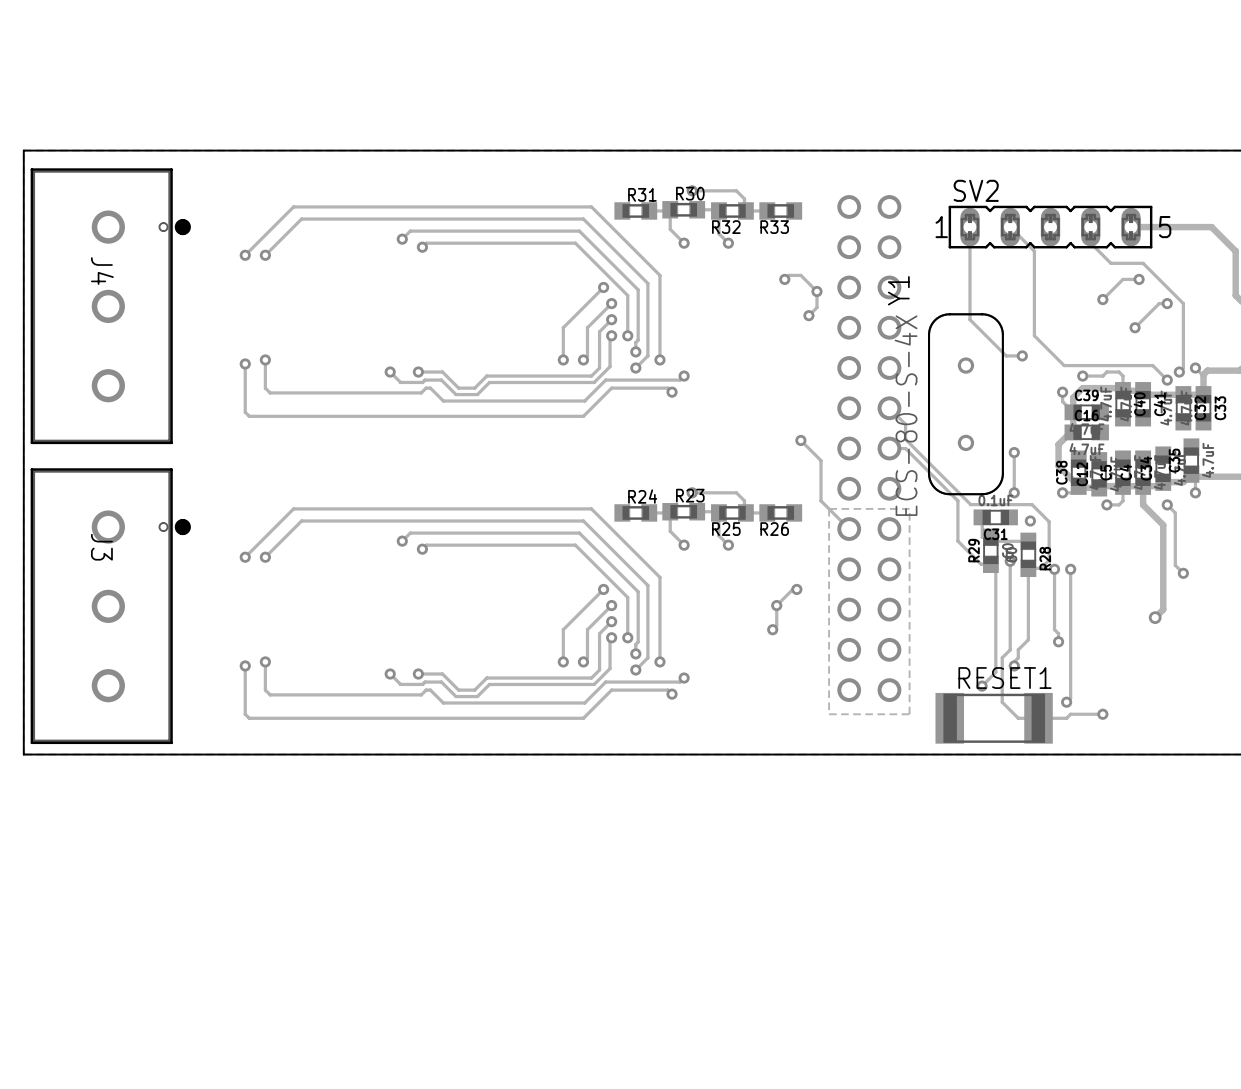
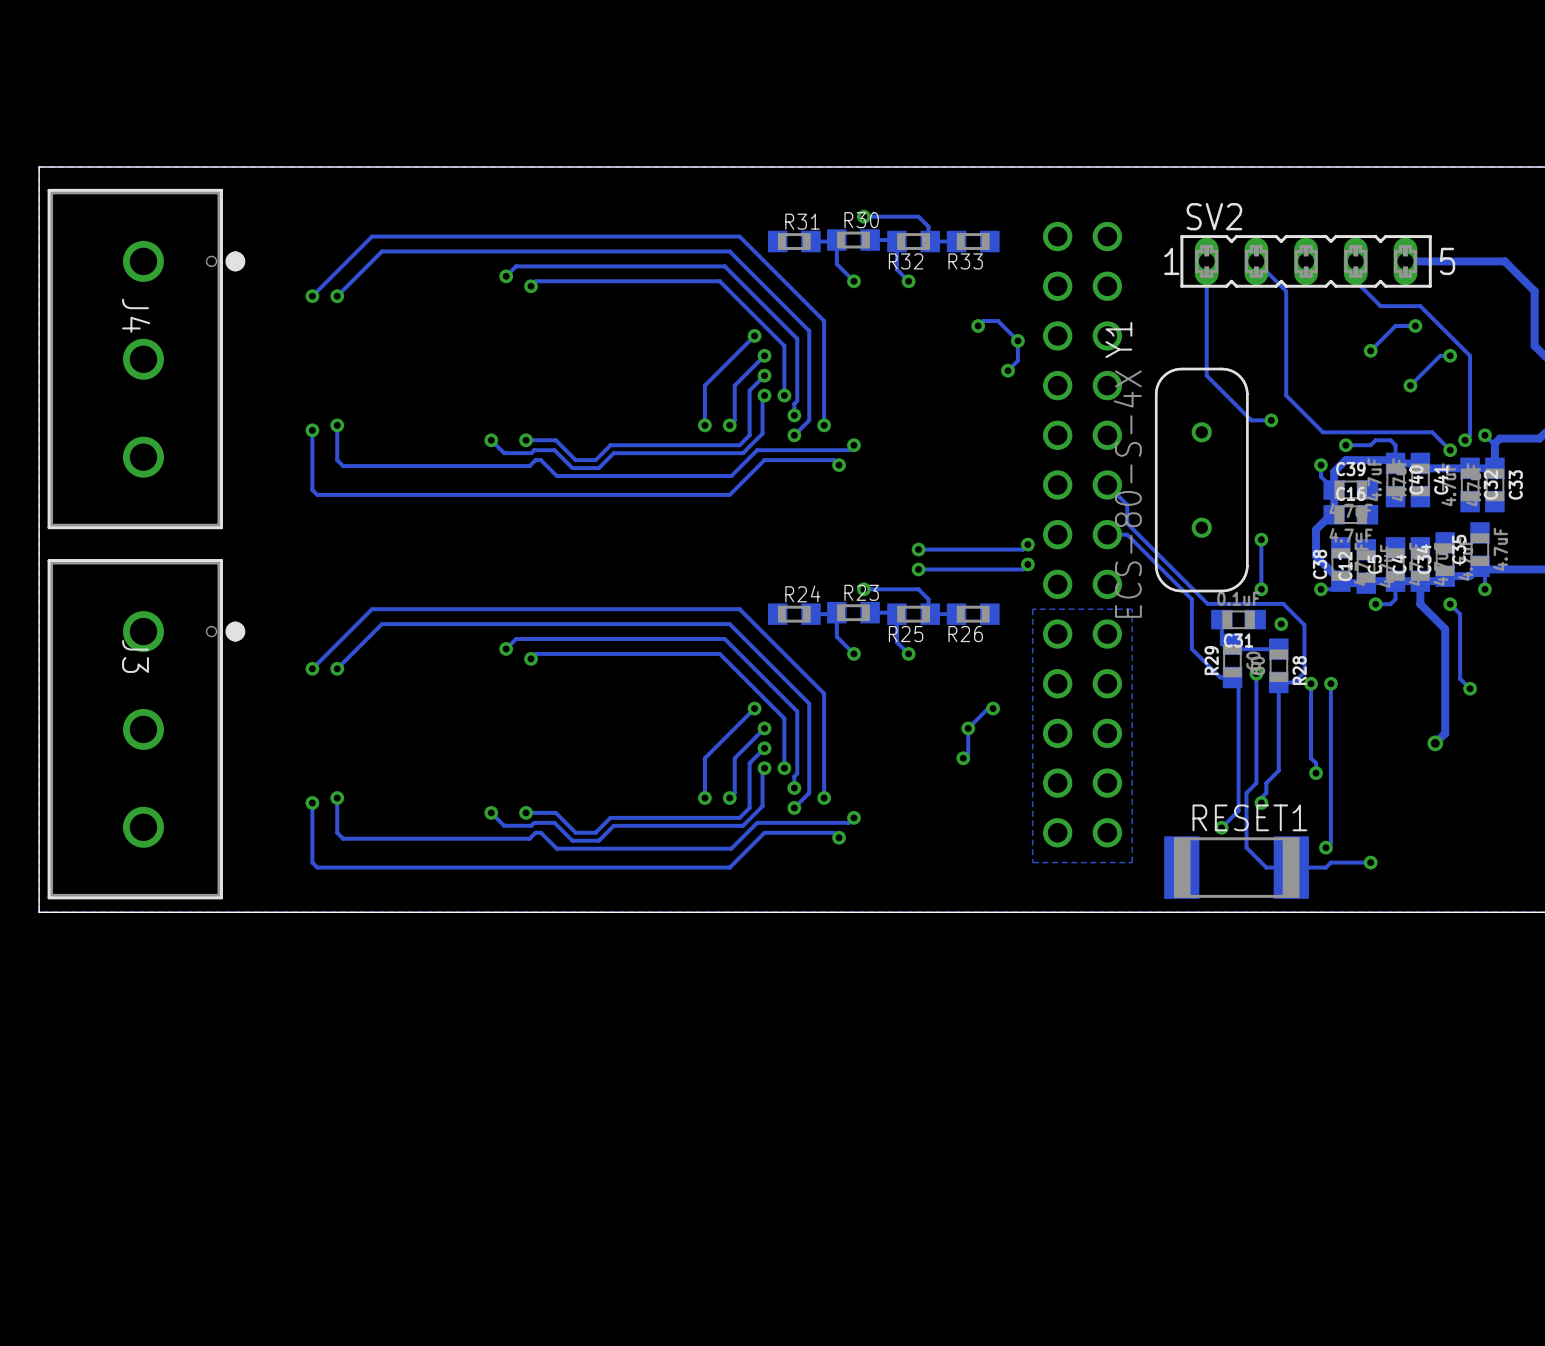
track: (800, 440) (821, 460) (821, 500) (849, 529) -> none
via: (800, 440) -> none
track: none -> (1027, 544) (1022, 549) (918, 549)
via: none -> (1027, 544)
via: none -> (918, 549)
track: none -> (1027, 564) (1022, 569) (918, 569)
via: none -> (1027, 564)
via: none -> (918, 569)

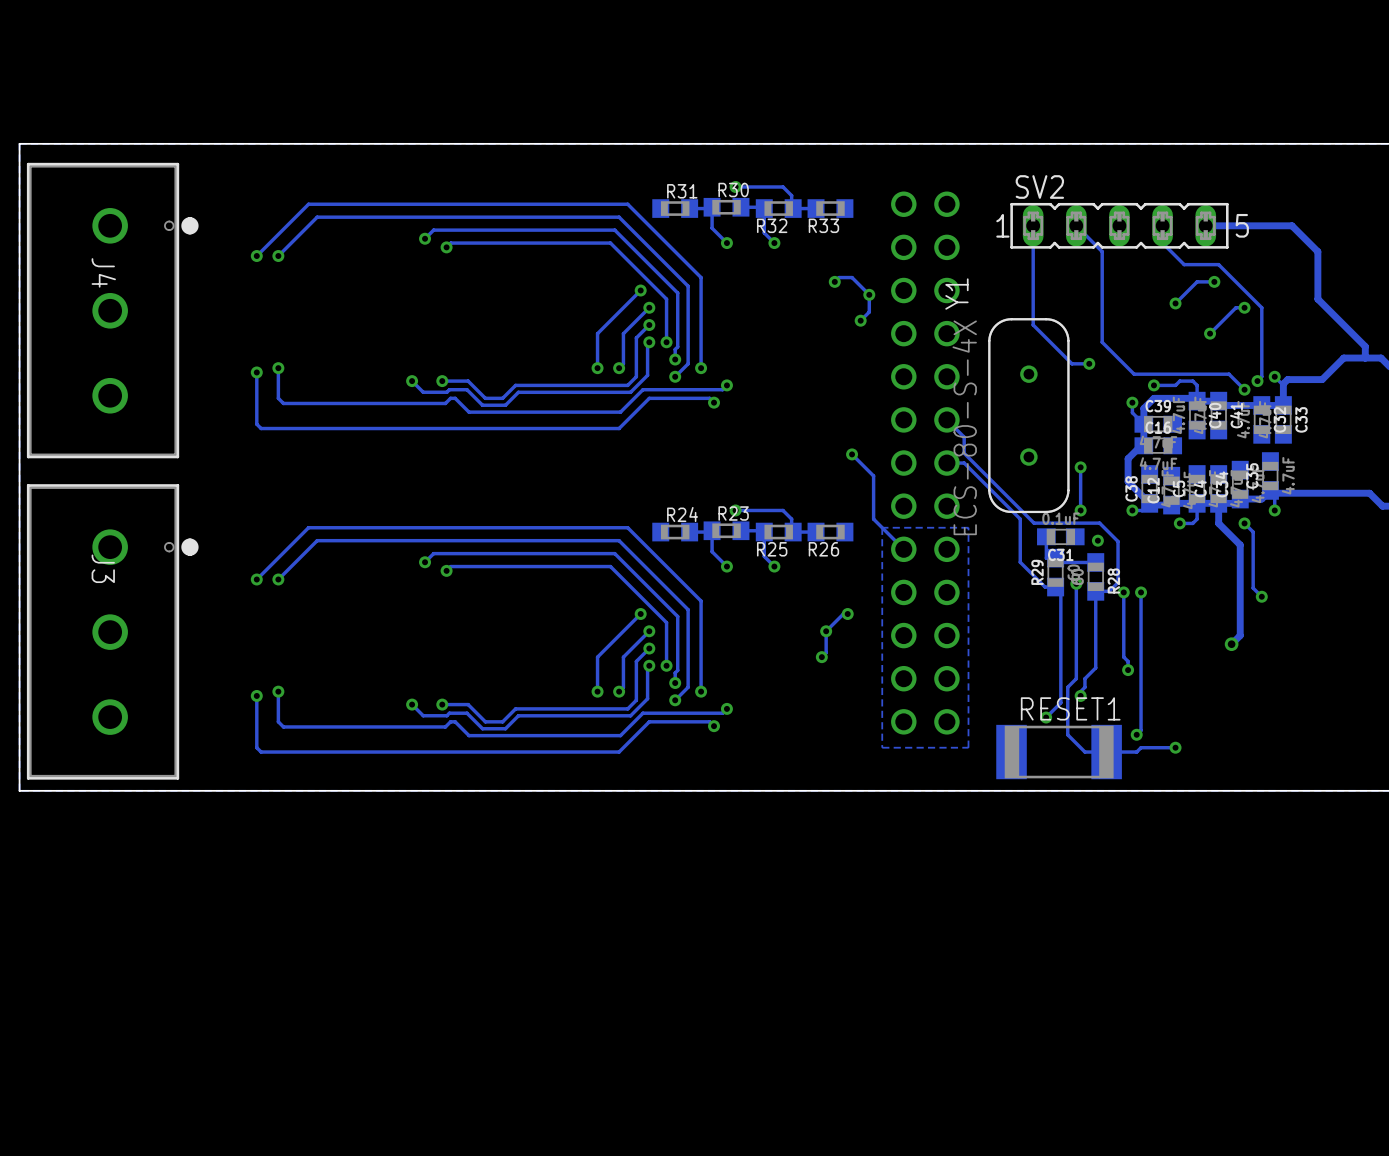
track: none -> (852, 454) (873, 475) (873, 519) (903, 549)
via: none -> (852, 454)
track: (1027, 544) (1022, 549) (918, 549) -> none
via: (1027, 544) -> none
via: (918, 549) -> none
track: (1027, 564) (1022, 569) (918, 569) -> none
via: (1027, 564) -> none
via: (918, 569) -> none

